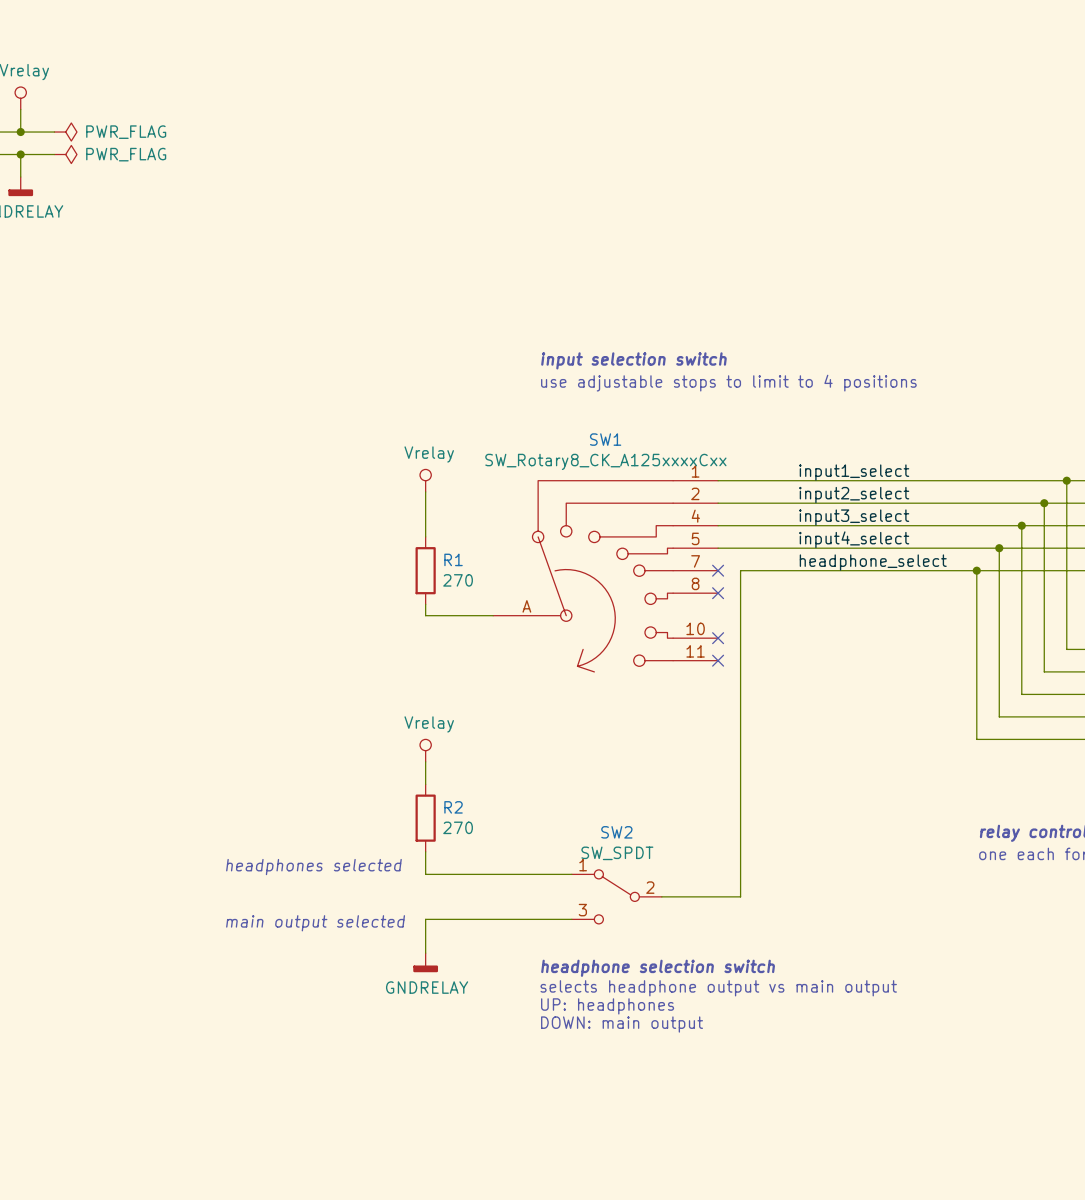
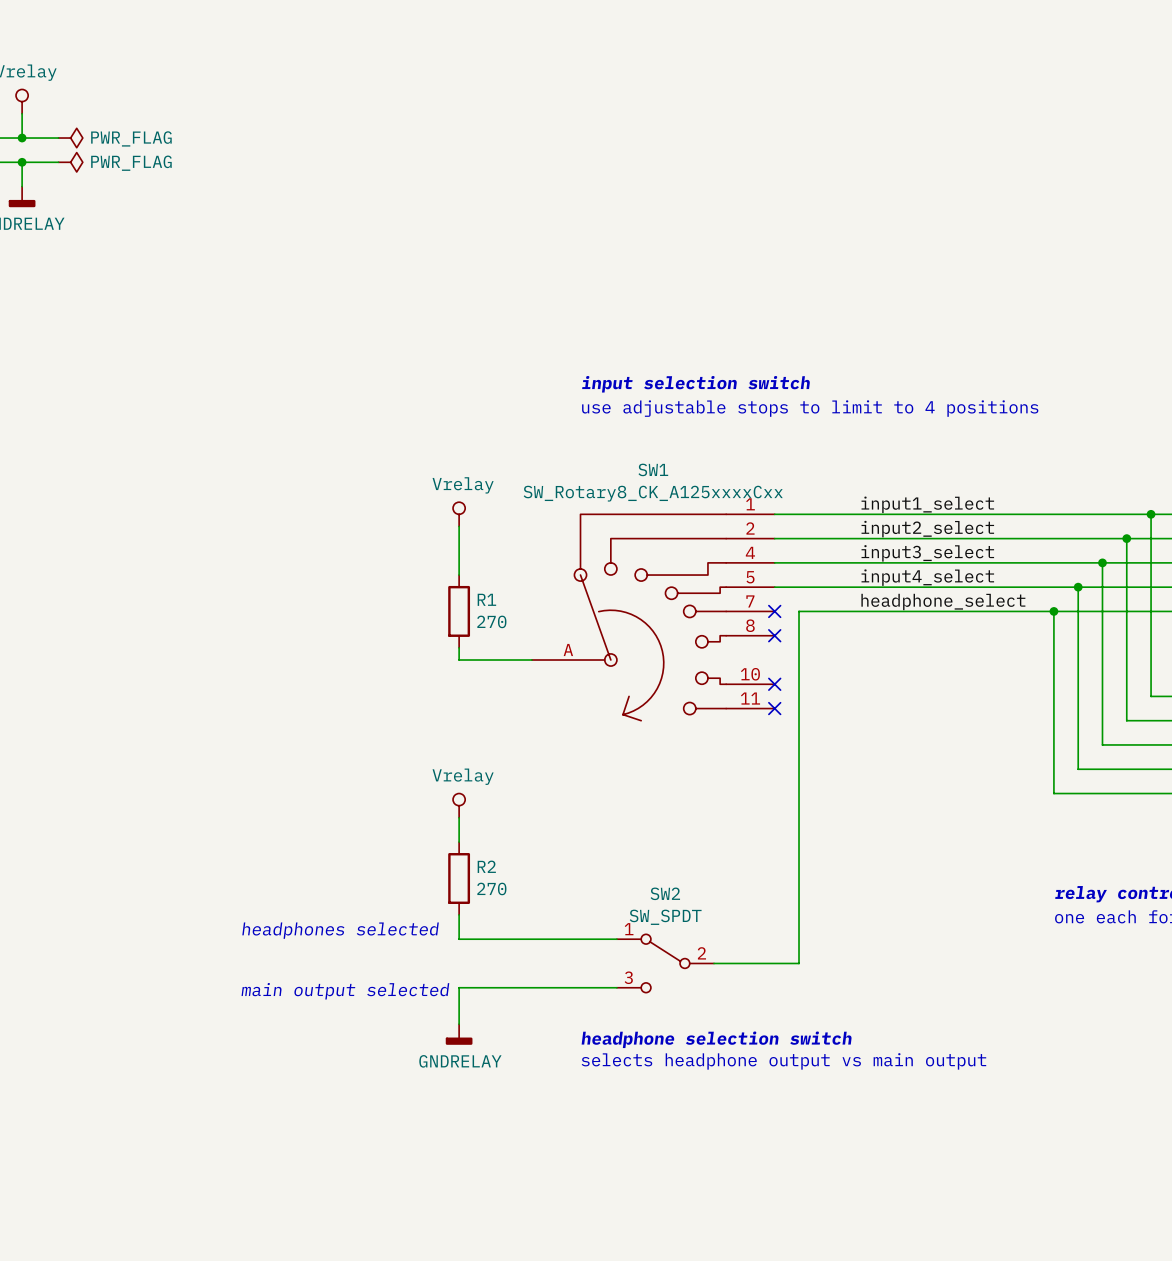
text: UP: headphones (607, 1006) -> none
text: DOWN: main output (622, 1024) -> none

